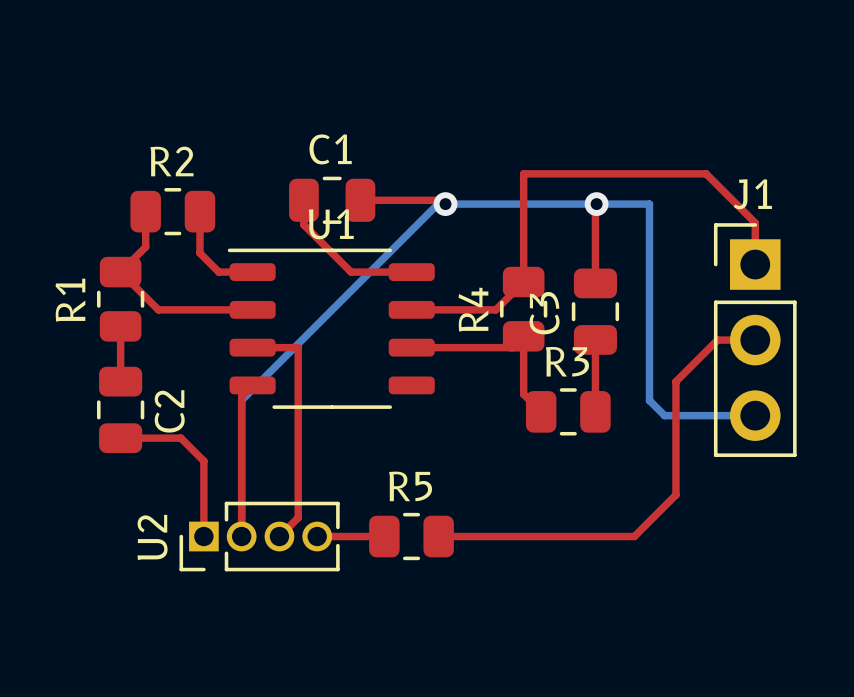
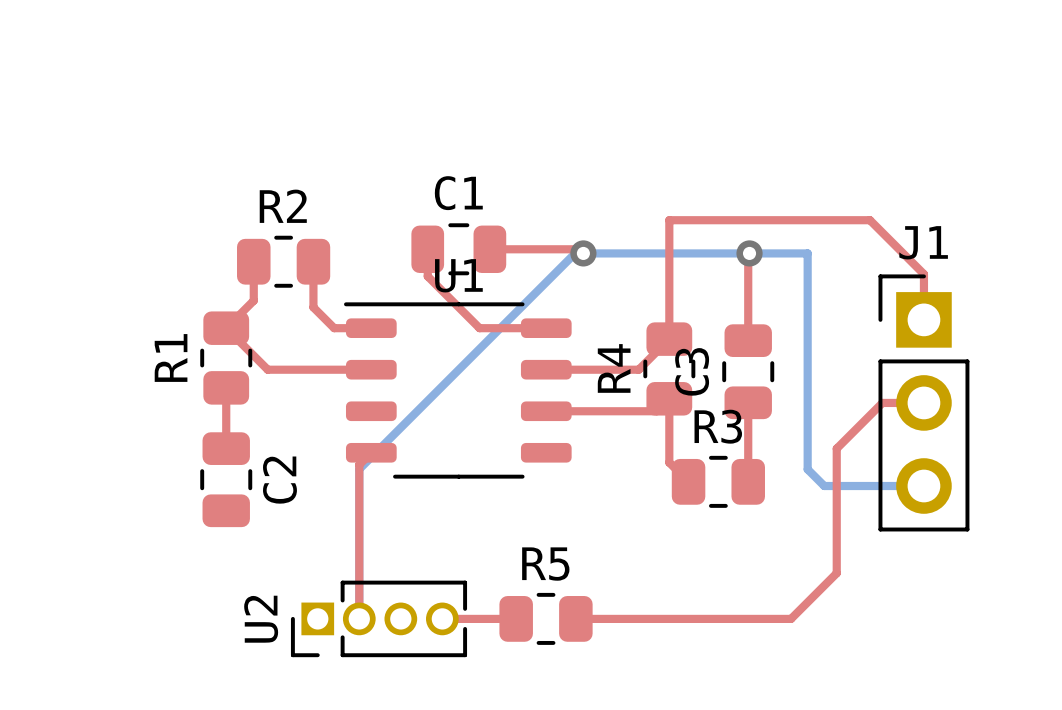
top track: (252, 347) (298, 347) (298, 517) (279, 536) -> none
top track: (120, 438) (180, 438) (203, 461) (203, 536) -> none

